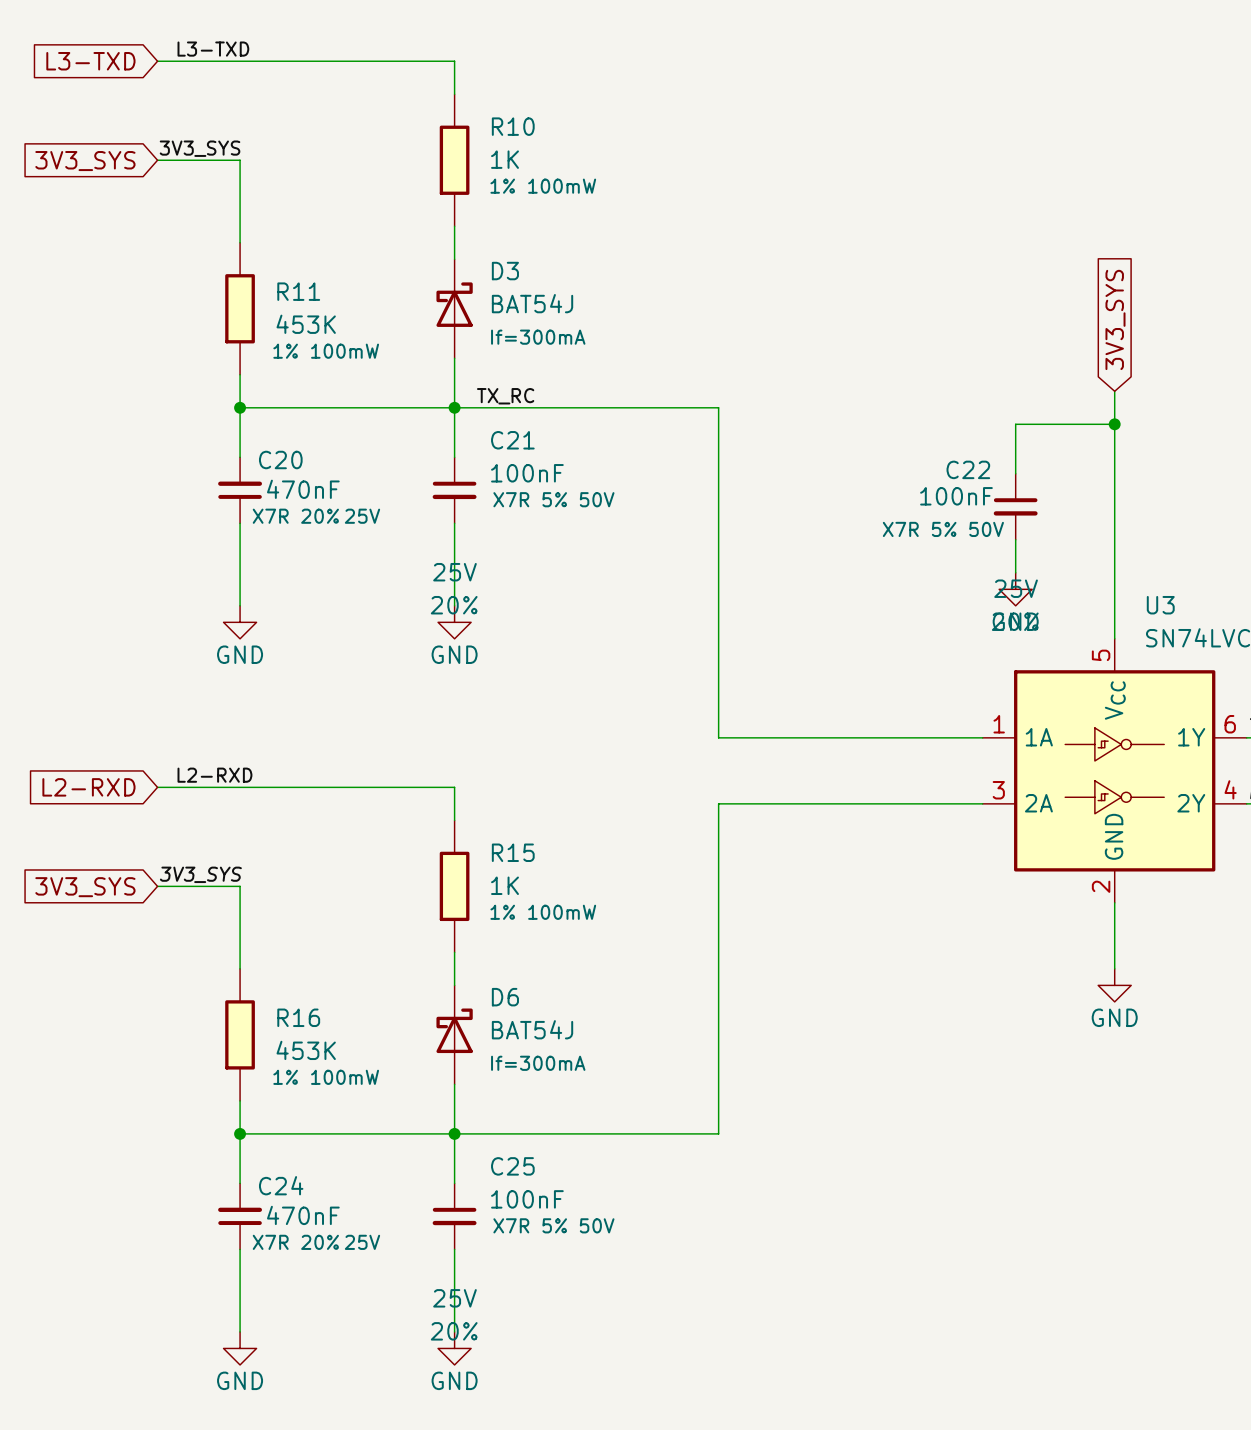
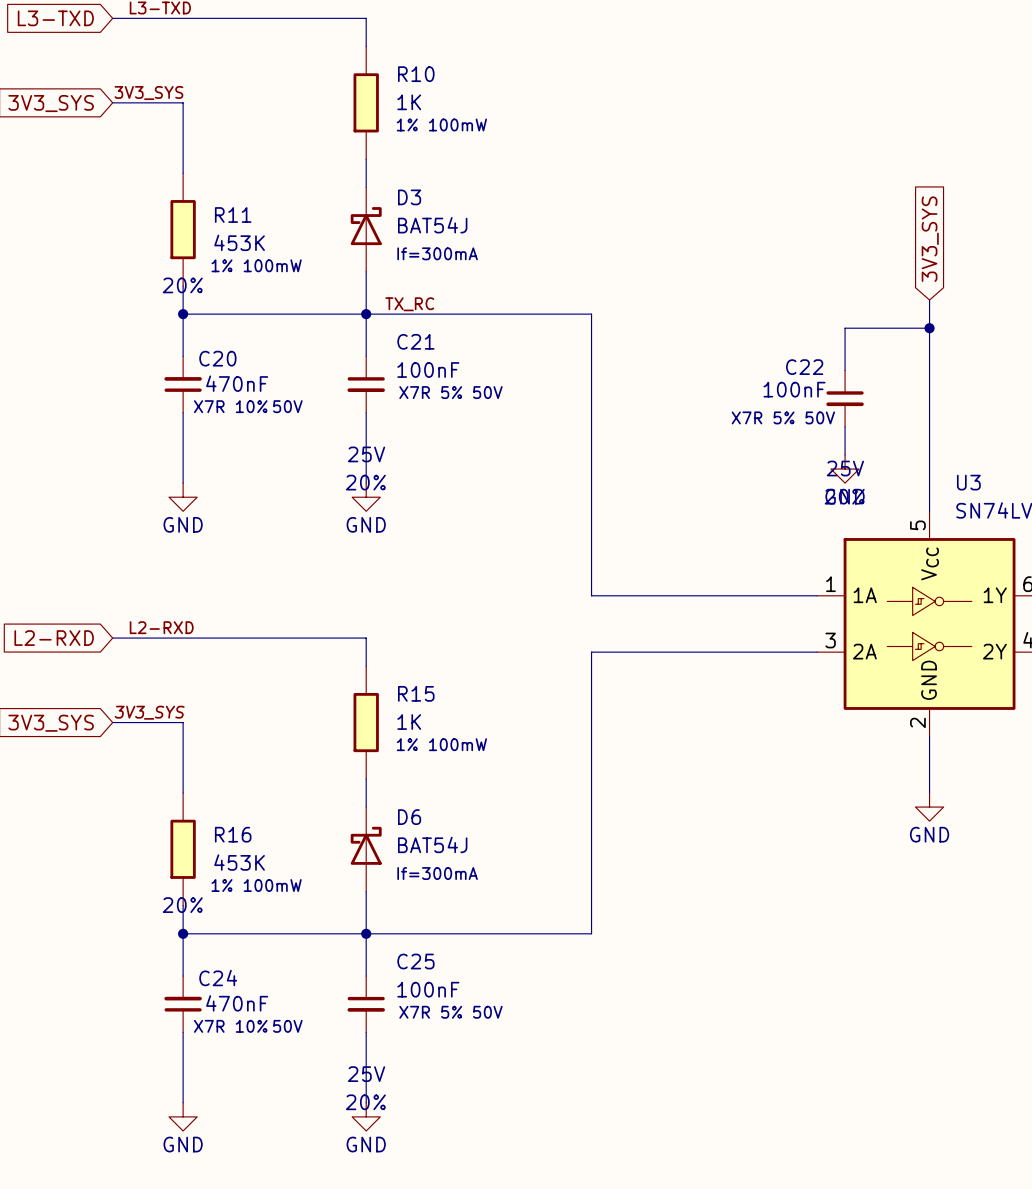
C20 text: none -> 20% (182, 285)
C20 text: X7R 20% (295, 516) -> X7R 10% (230, 406)
C20 text: 25V (362, 516) -> 50V (287, 406)
C24 text: none -> 20% (182, 905)
C24 text: X7R 20% (295, 1242) -> X7R 10% (230, 1026)
C24 text: 25V (362, 1242) -> 50V (287, 1026)

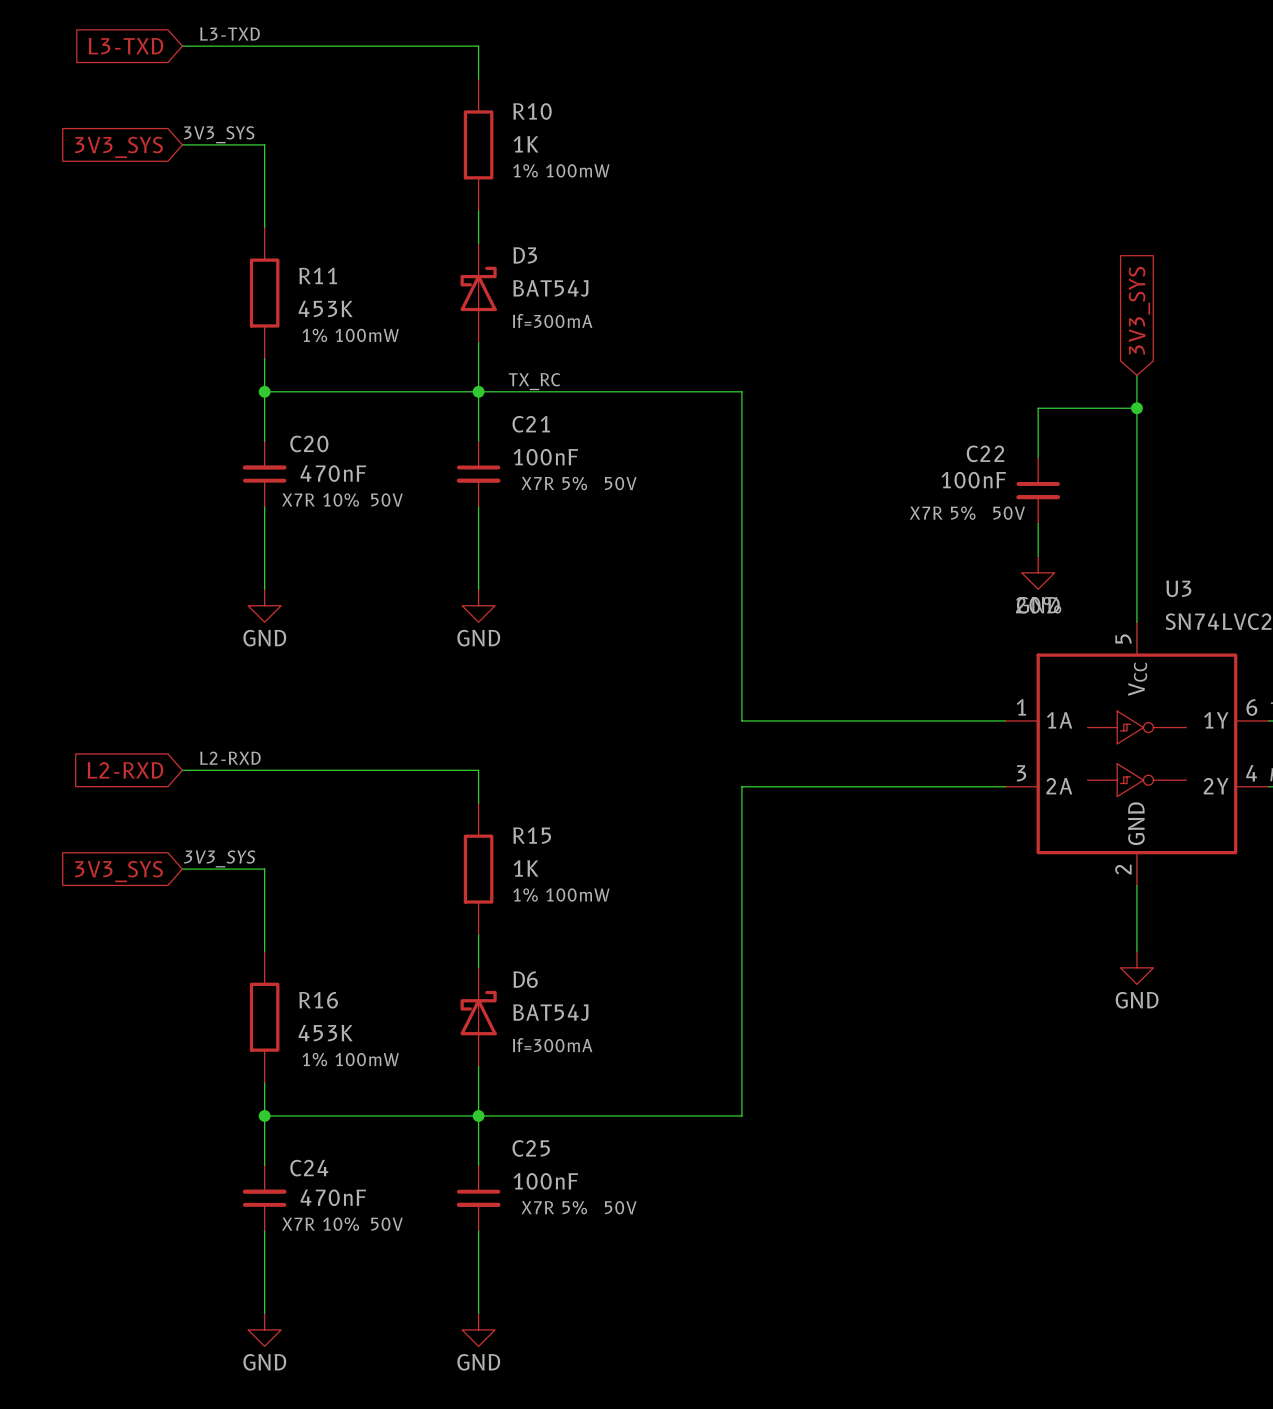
C20 text: 20% (182, 285) -> none
C21 text: 25V (366, 454) -> none
C22 text: 25V (845, 468) -> none
C21 text: 20% (365, 482) -> none
C24 text: 20% (182, 905) -> none
C25 text: 25V (366, 1074) -> none
C25 text: 20% (365, 1102) -> none

